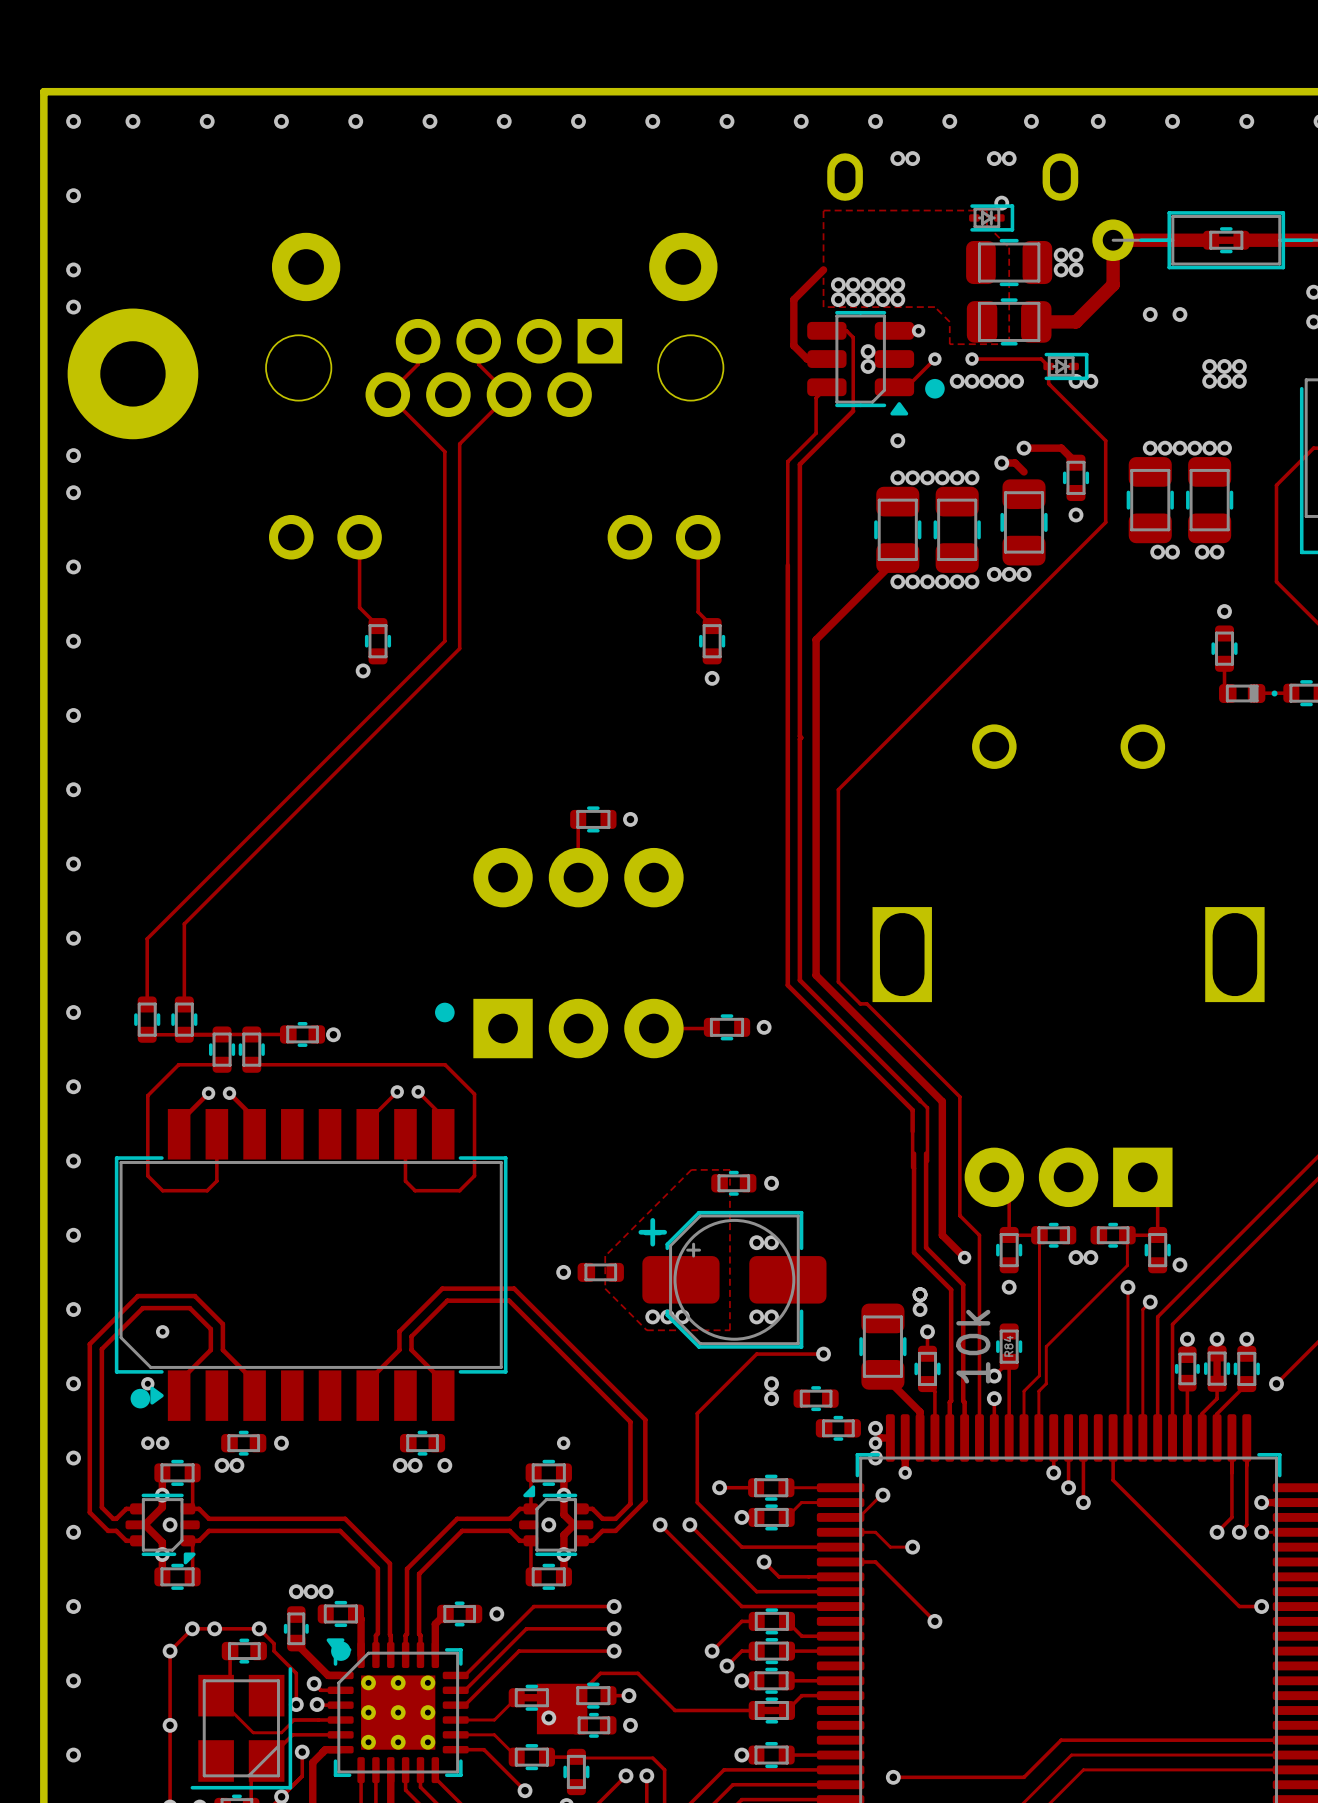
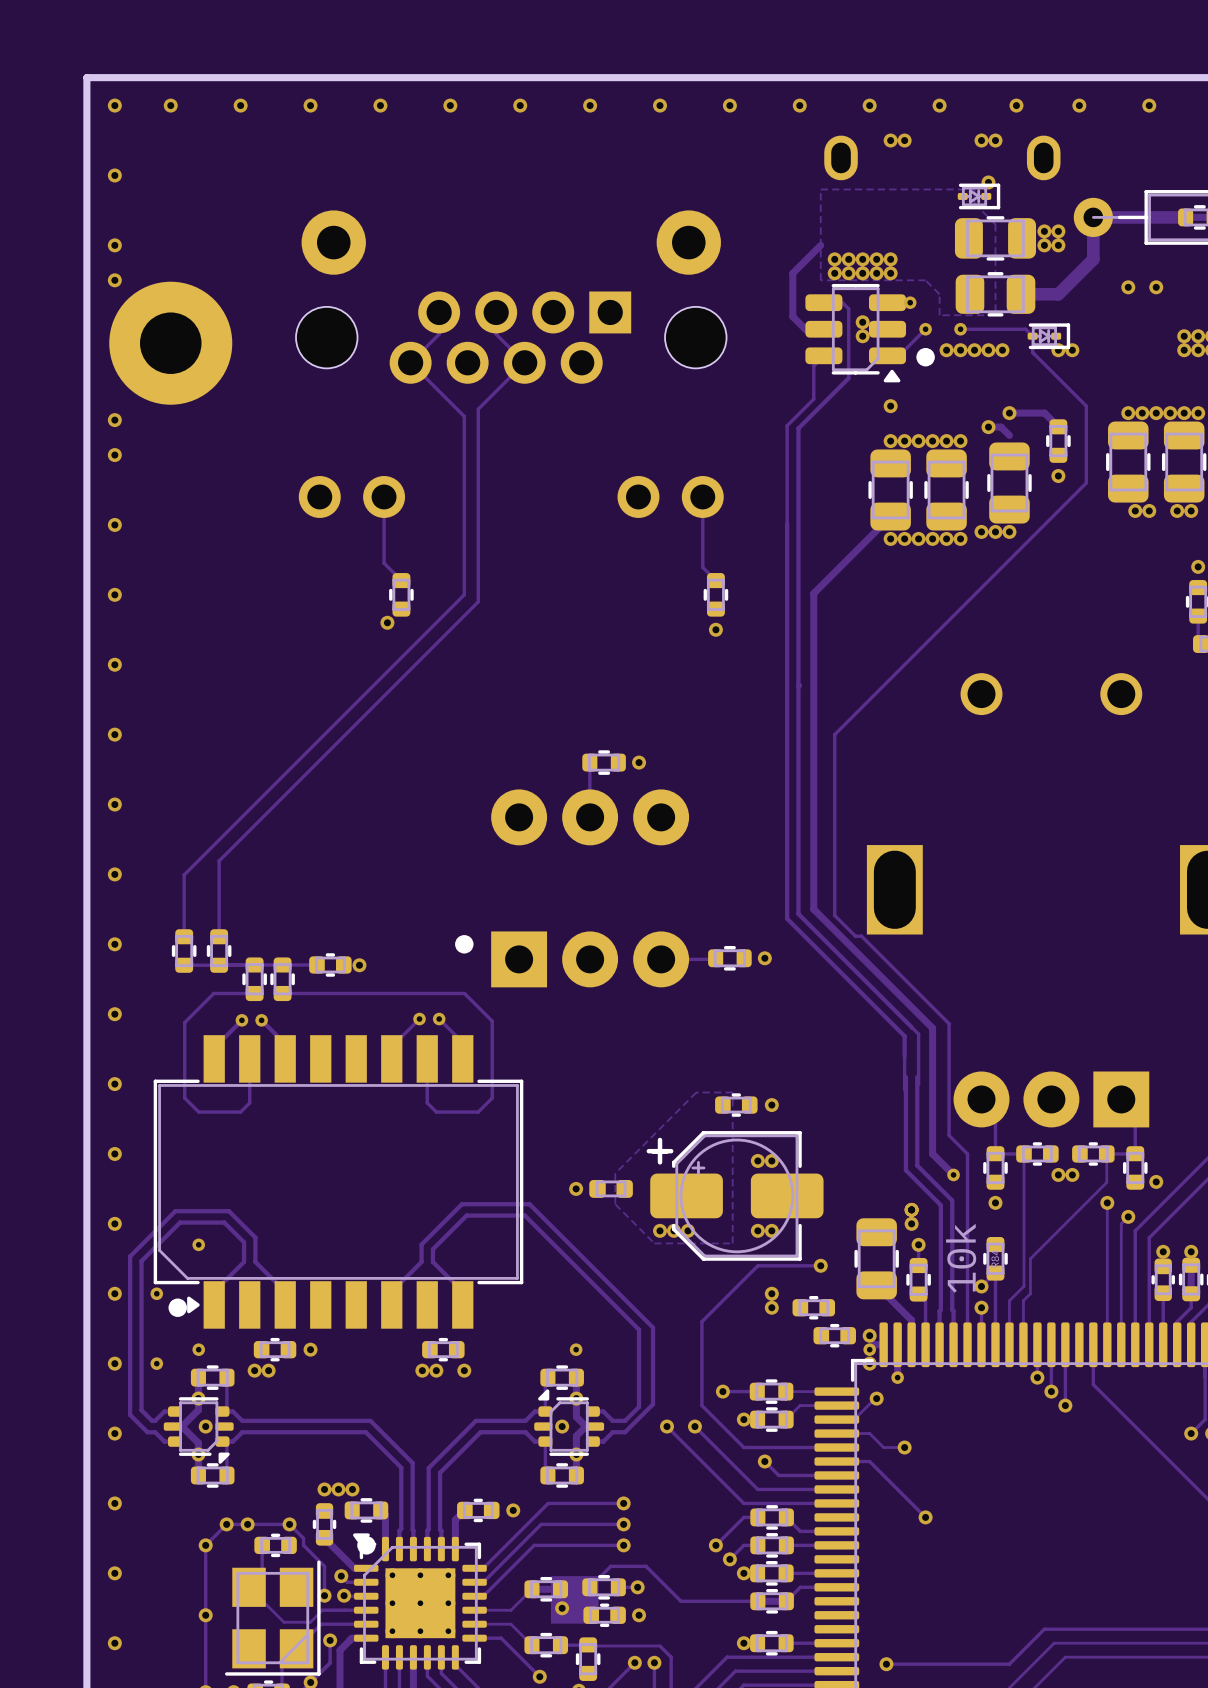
via position: (147, 1383) -> (156, 1293)
via: (147, 1443) -> none
via: none -> (156, 1363)

